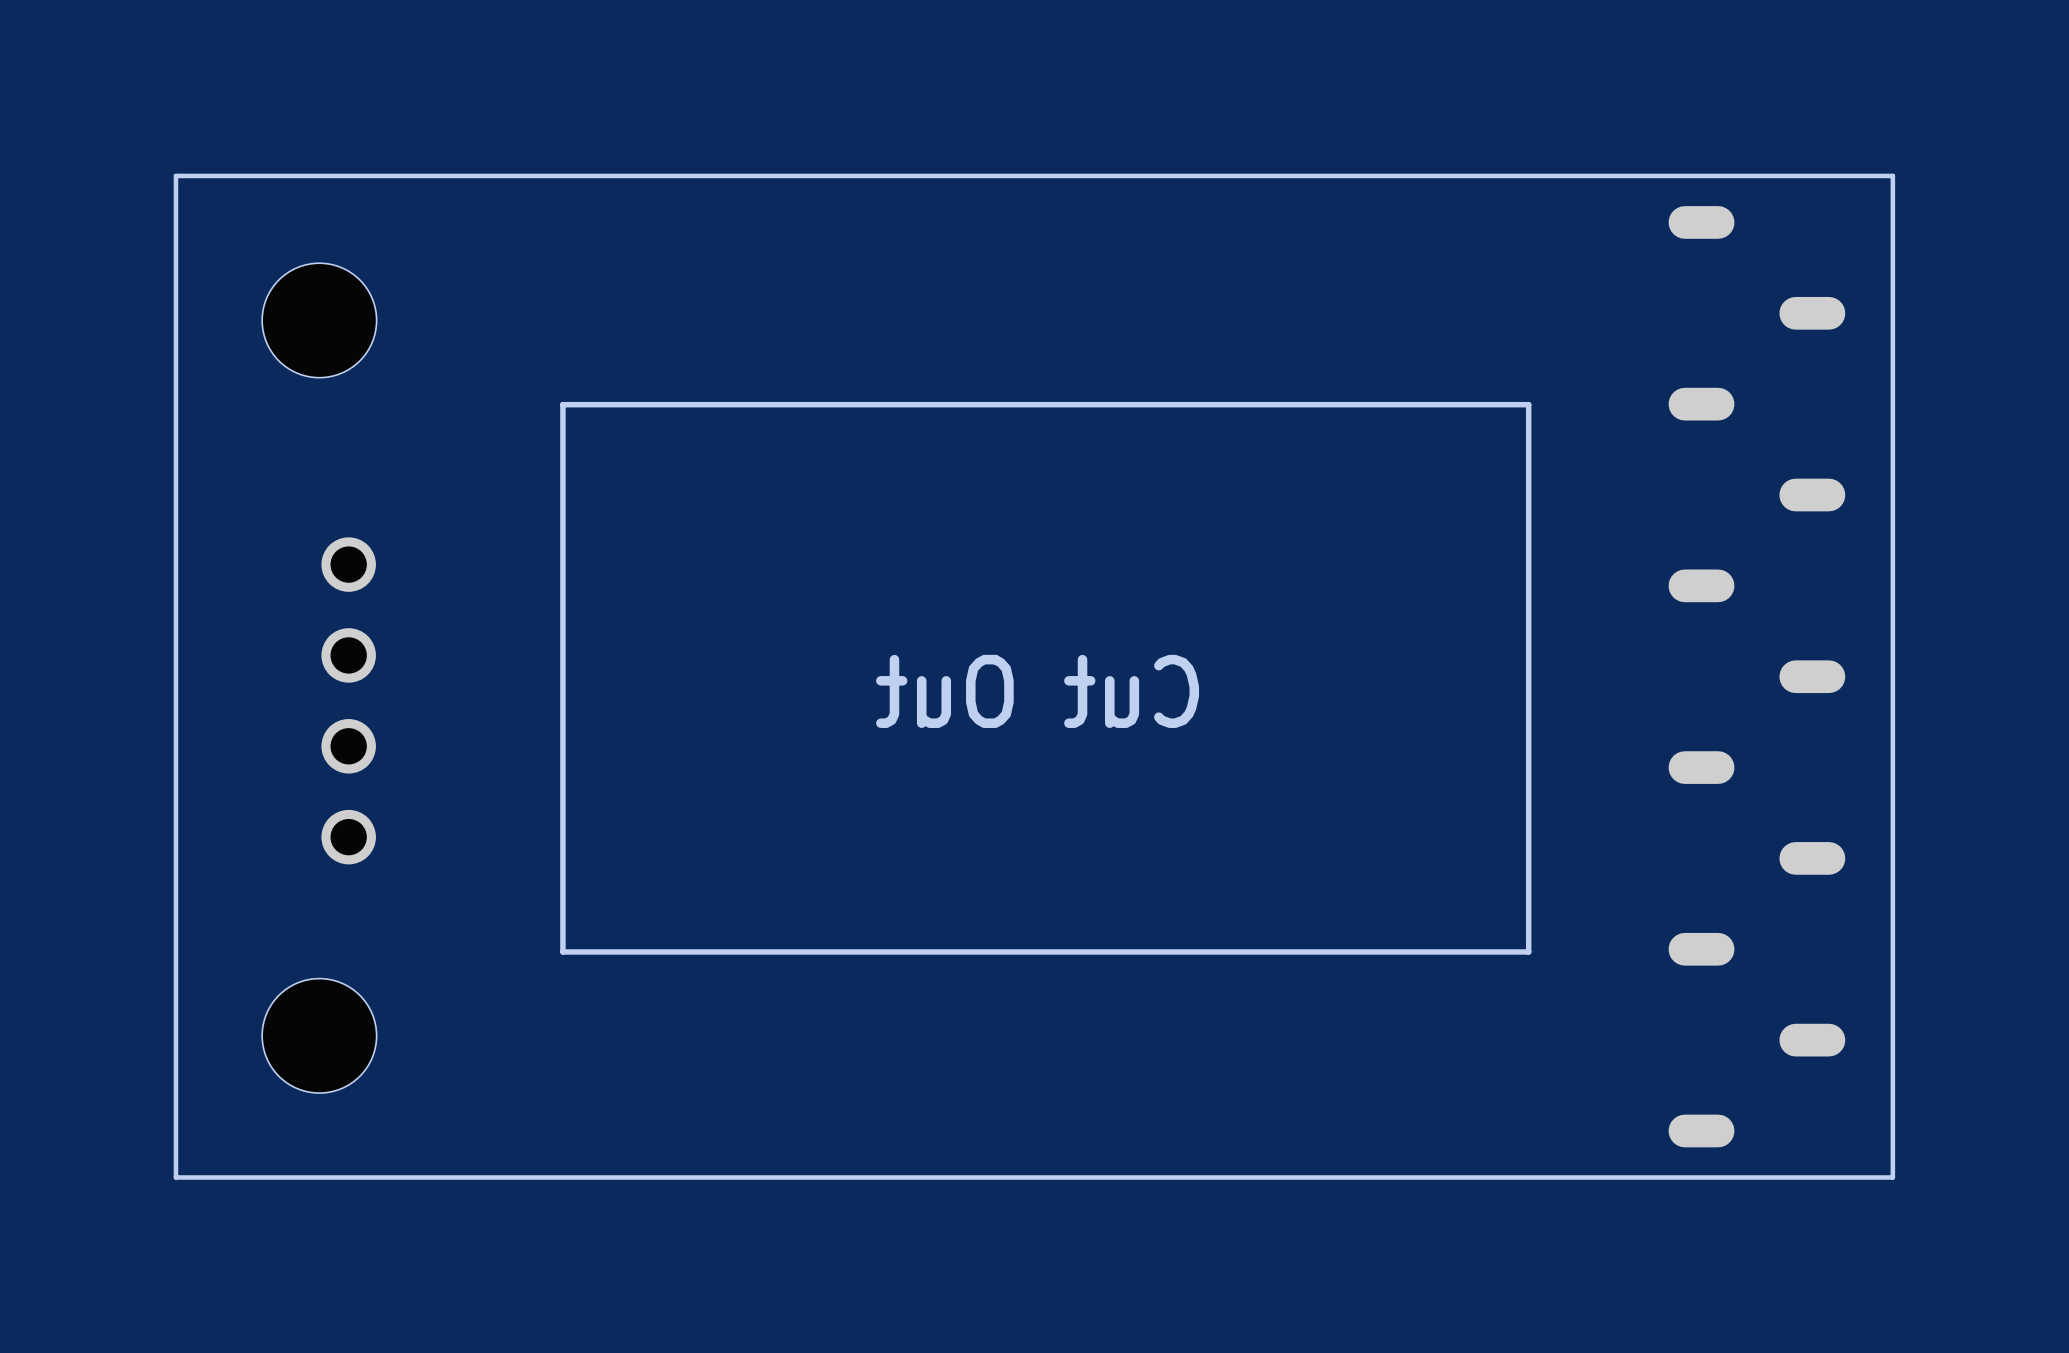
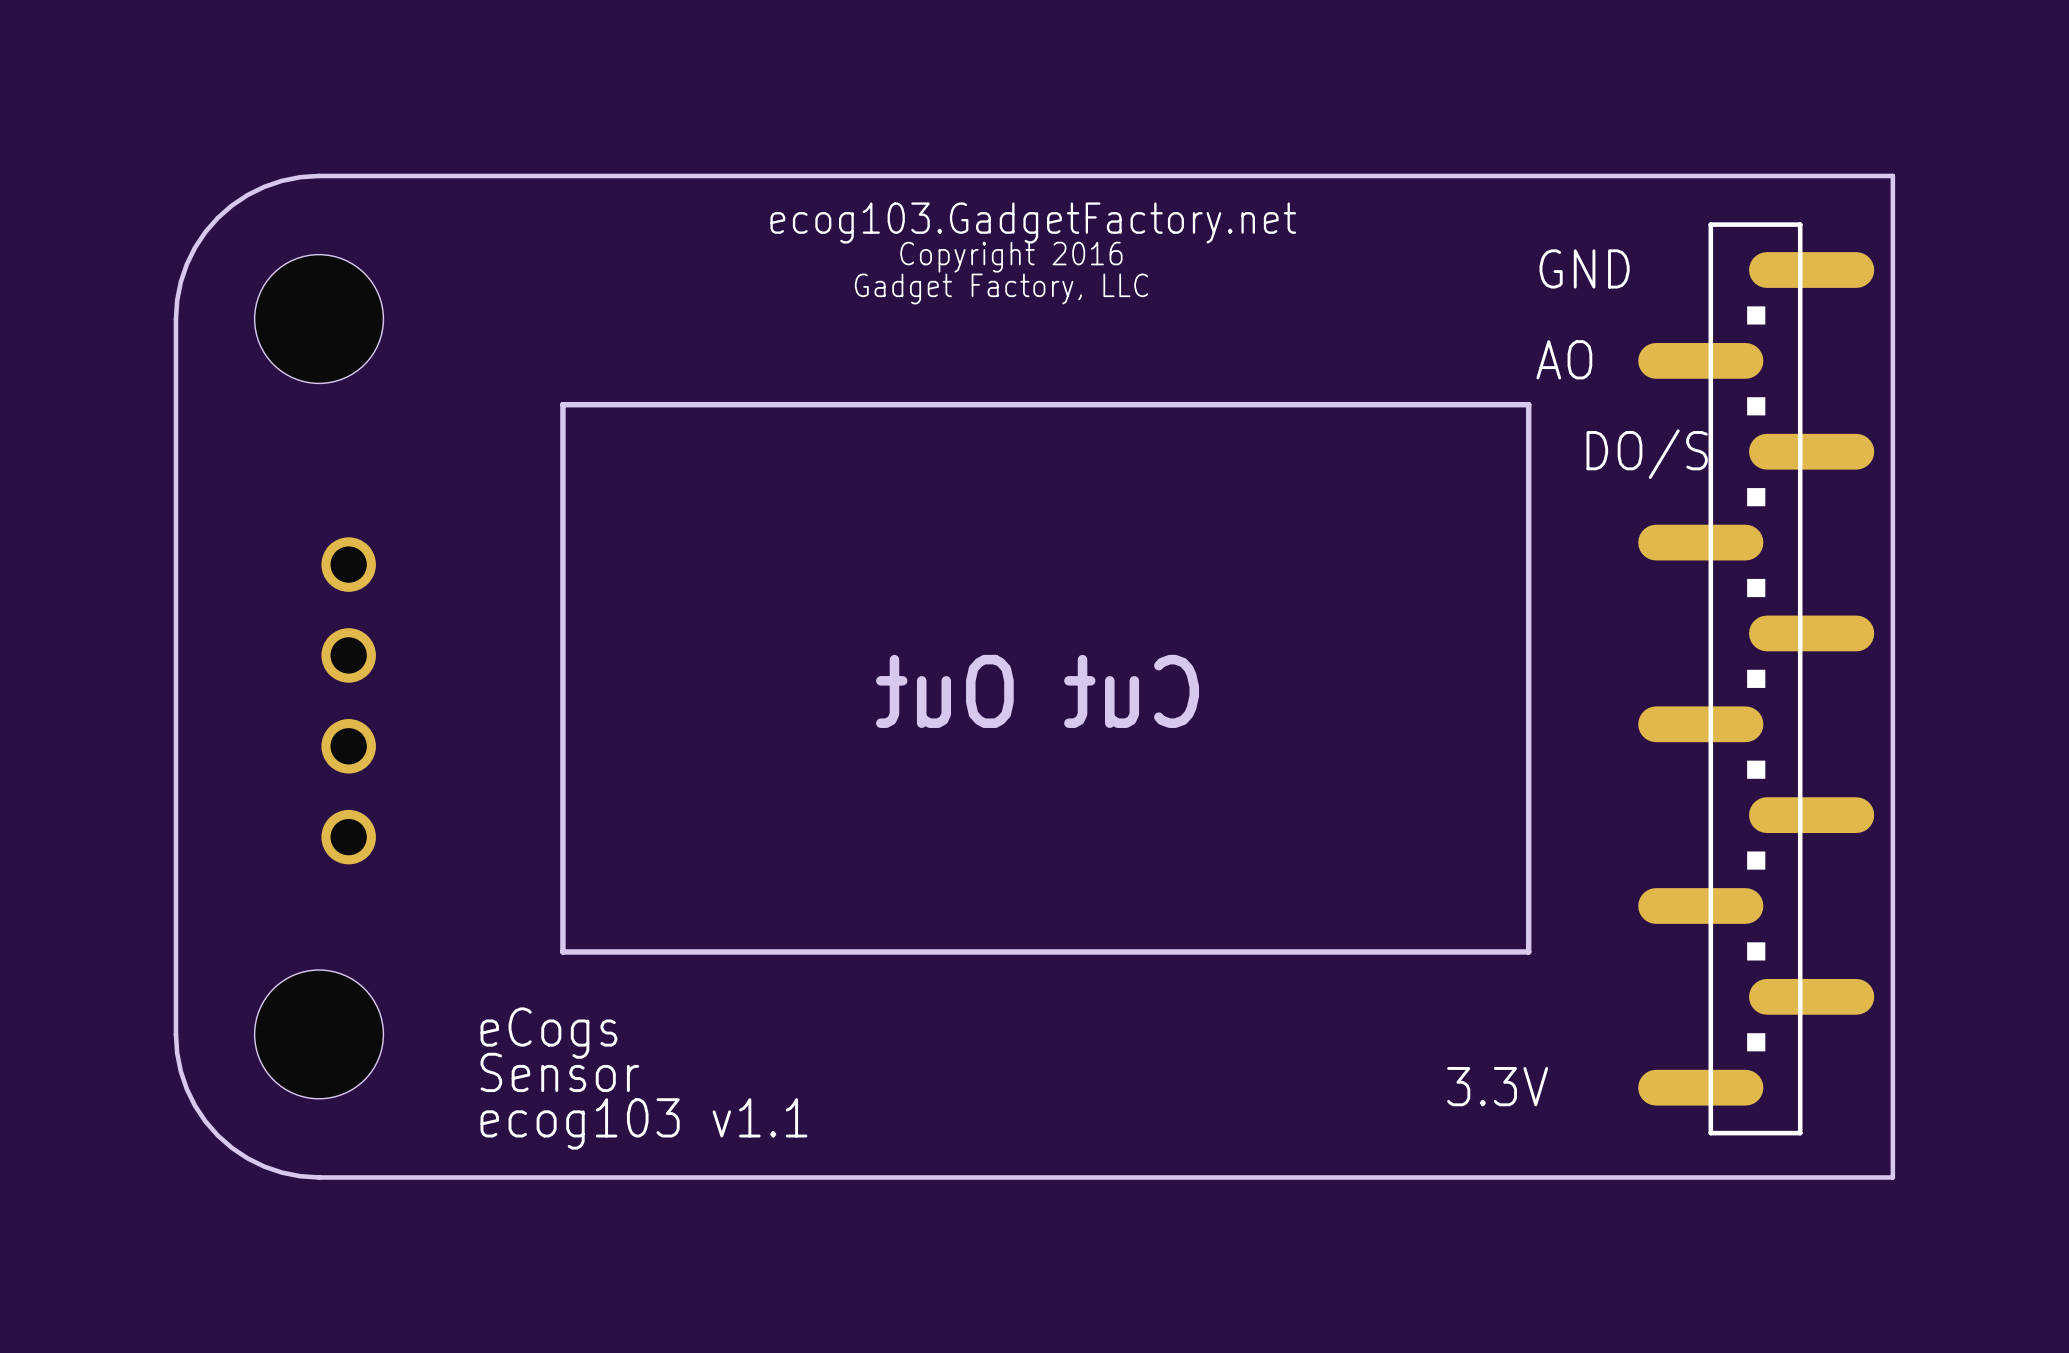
part footprint: [173, 173, 1896, 1180] -> [173, 173, 1896, 1180]
text: none -> ecog103.GadgetFactory.net (1033, 222)
text: none -> Copyright 2016 (1011, 257)
text: none -> GND (1584, 268)
text: none -> Gadget Factory, LLC (1001, 288)
text: none -> AO (1564, 359)
text: none -> DO/S (1647, 454)
text: none -> eCogs (548, 1033)
text: none -> Sensor (559, 1072)
text: none -> 3.3V (1497, 1086)
text: none -> ecog103 v1.1 (643, 1123)

